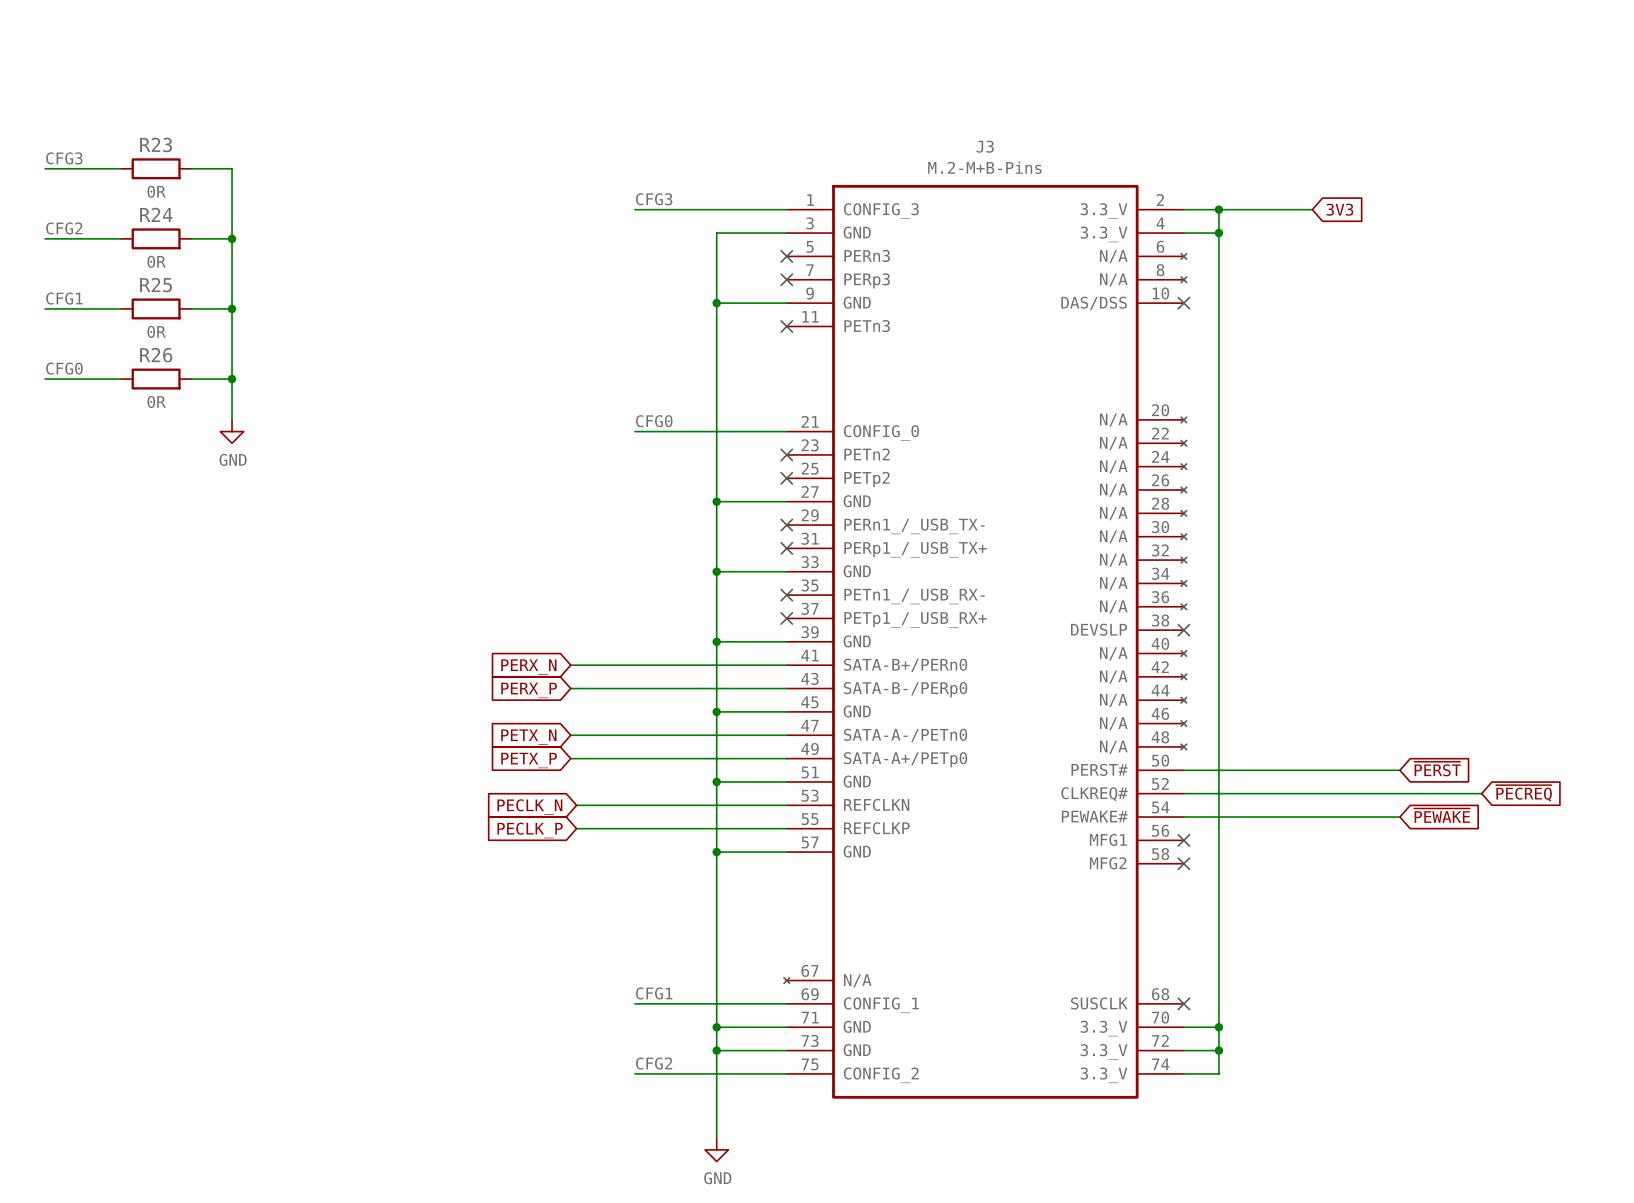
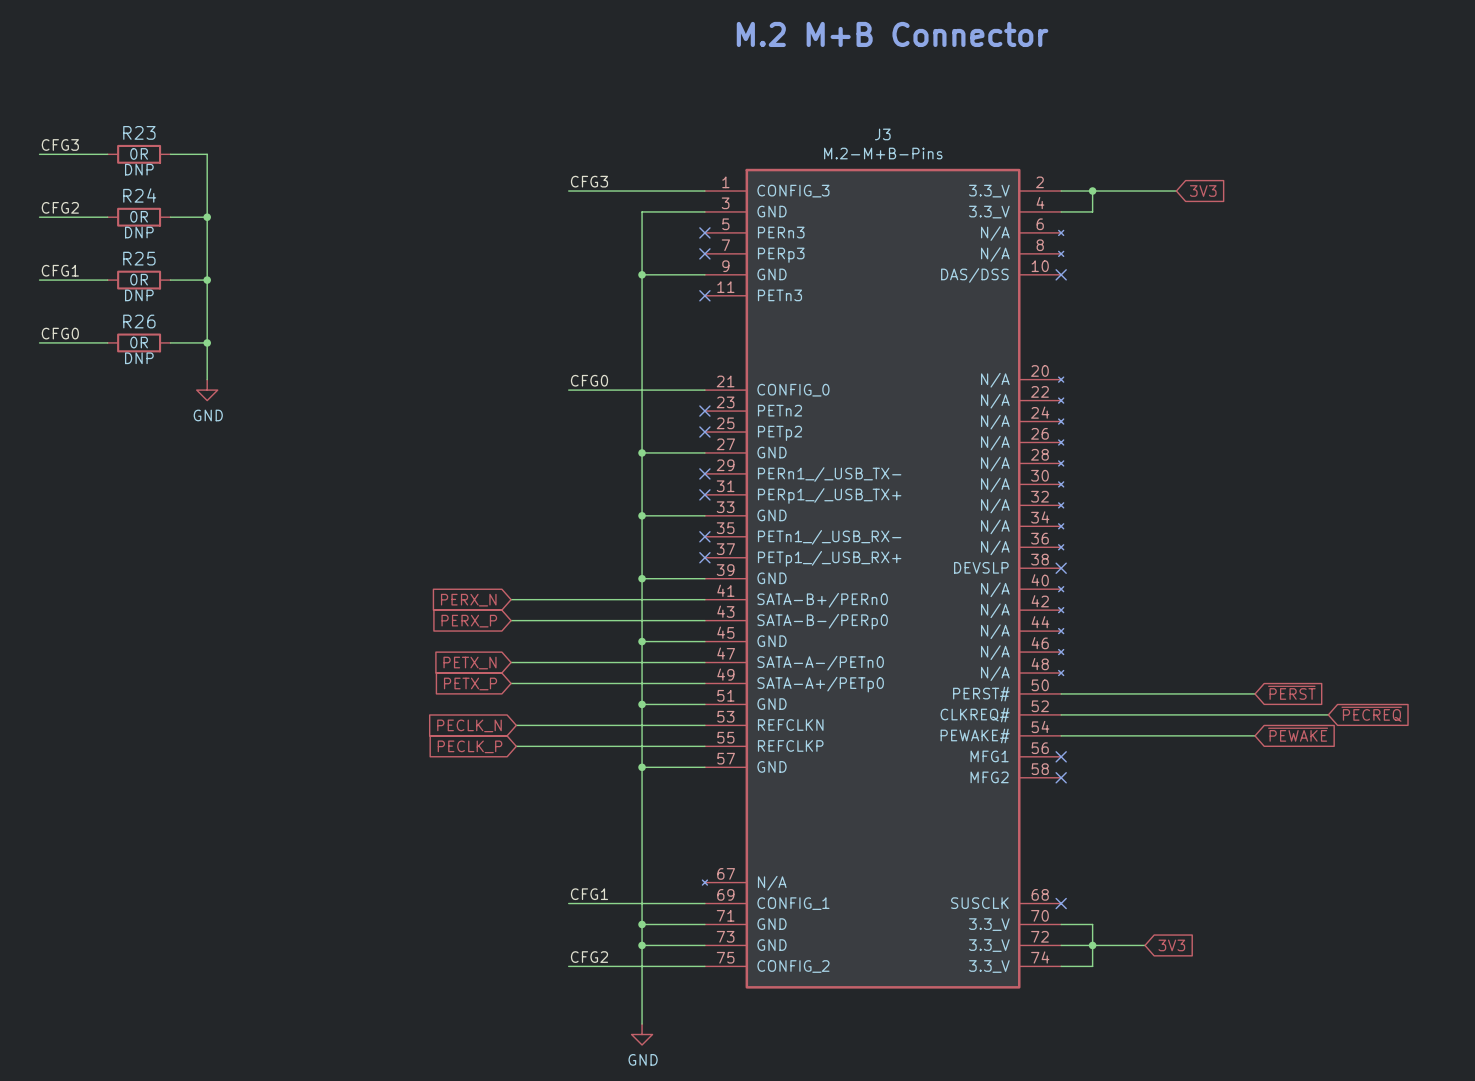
text: none -> M.2 M+B Connector (892, 34)
R23 text: none -> DNP (139, 169)
R23 text position: 0R (156, 191) -> 0R (139, 153)
wire: (1218, 233) (1218, 1027) -> none
junction: (1218, 233) -> none
R24 text: none -> DNP (139, 232)
R24 text position: 0R (156, 261) -> 0R (139, 216)
R25 text: none -> DNP (139, 295)
R25 text position: 0R (156, 331) -> 0R (139, 279)
R26 text: none -> DNP (139, 358)
R26 text position: 0R (156, 401) -> 0R (139, 342)
junction: (1218, 1027) -> none
wire: none -> (1092, 945) (1145, 945)
global label: none -> 3V3 (1171, 945)

